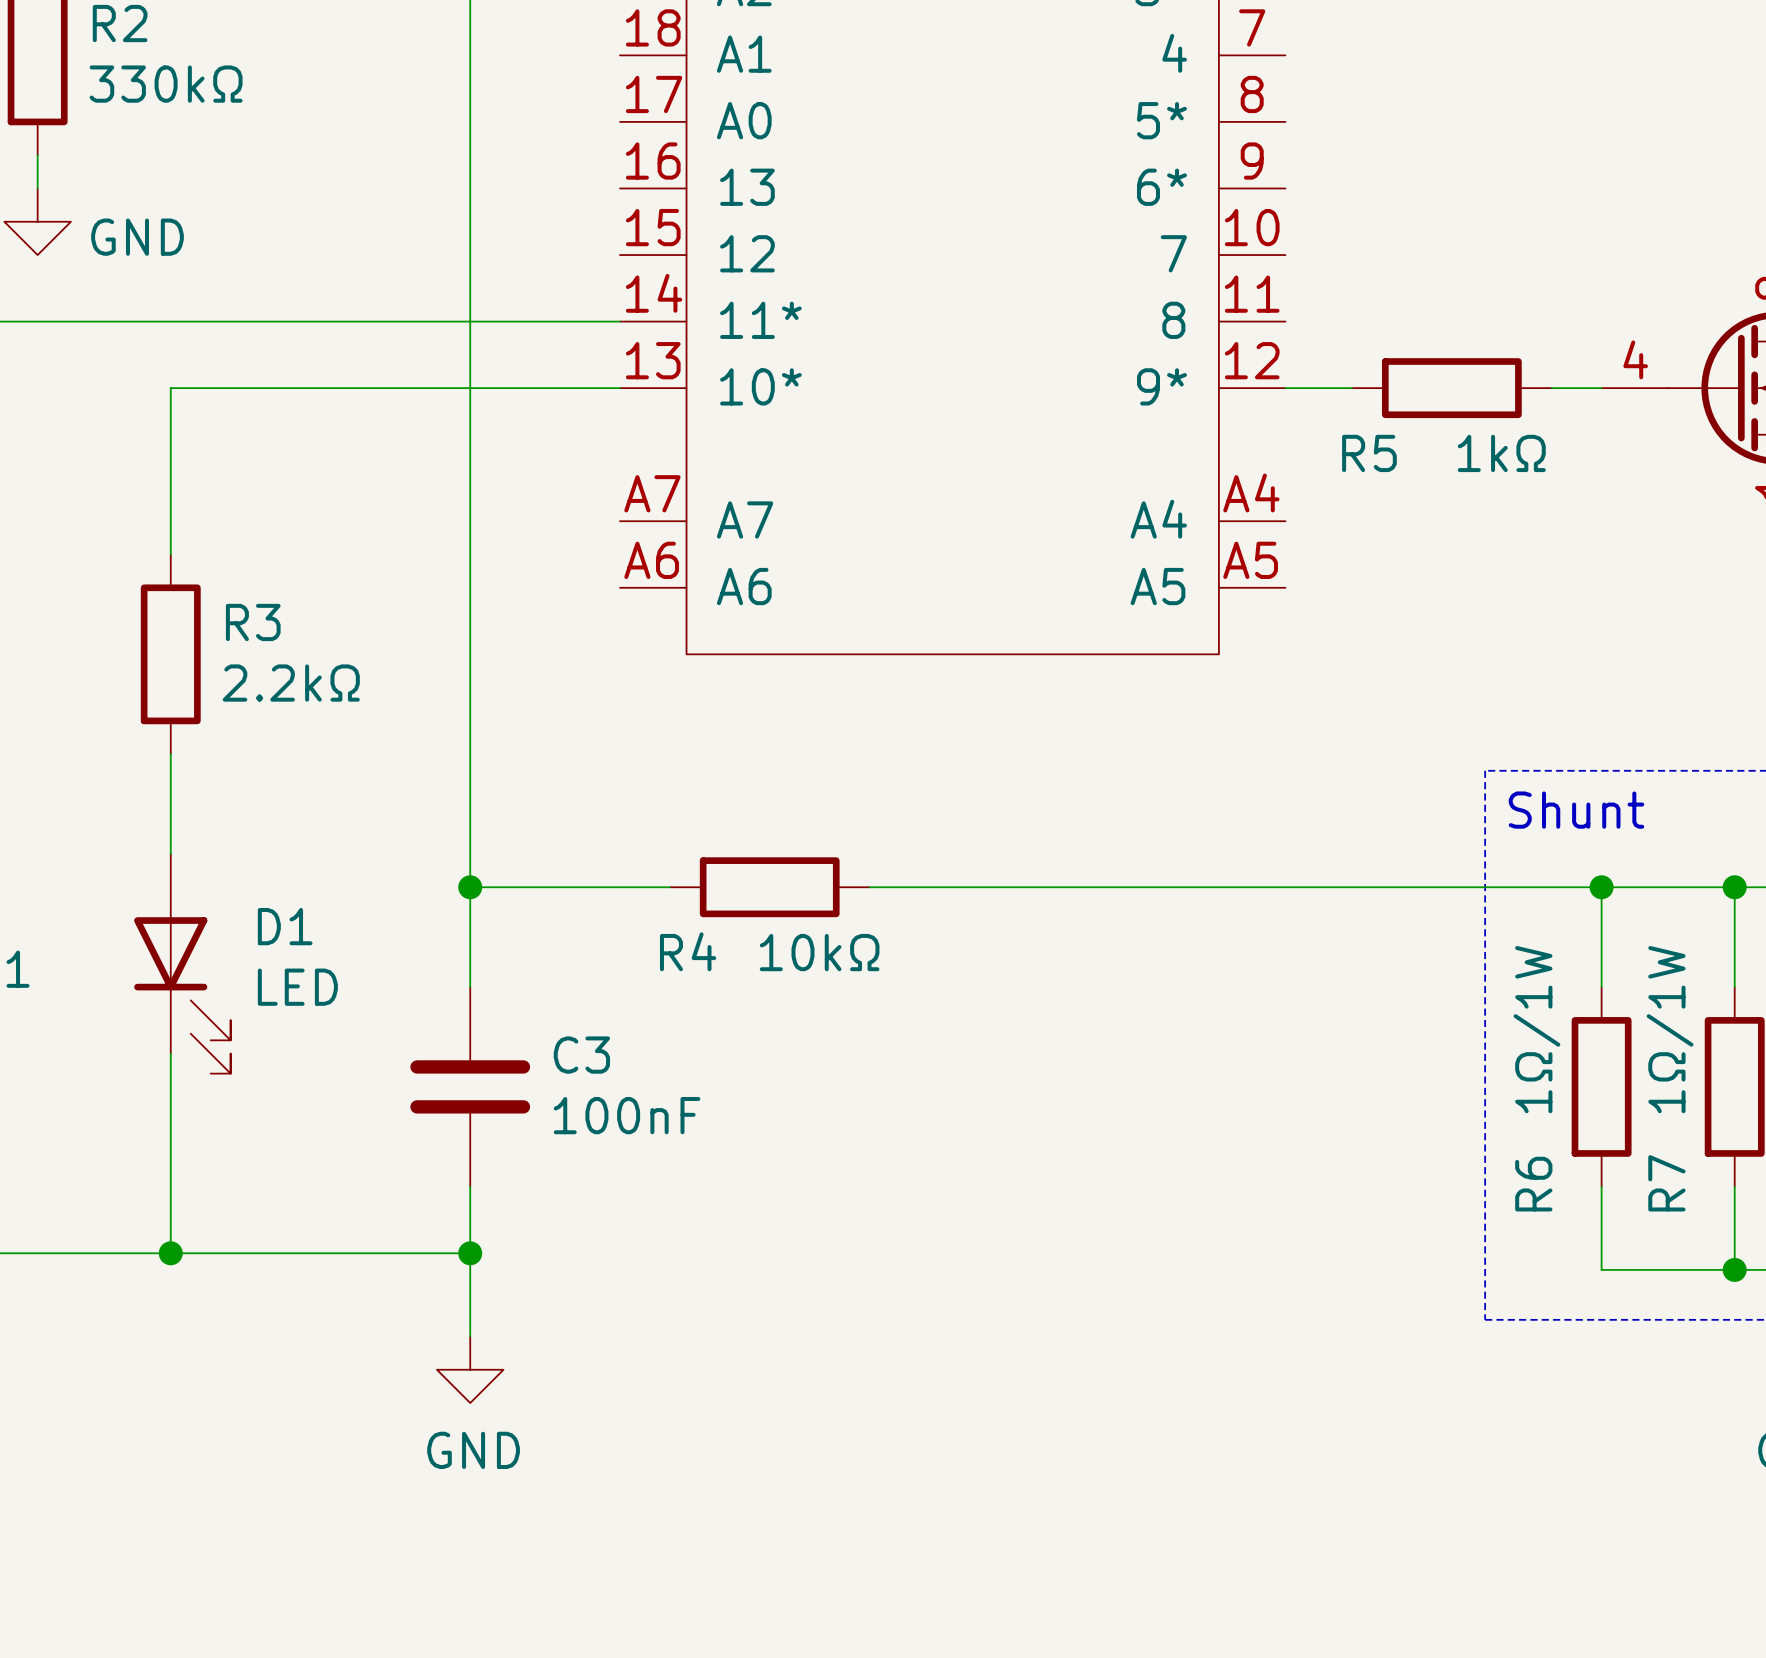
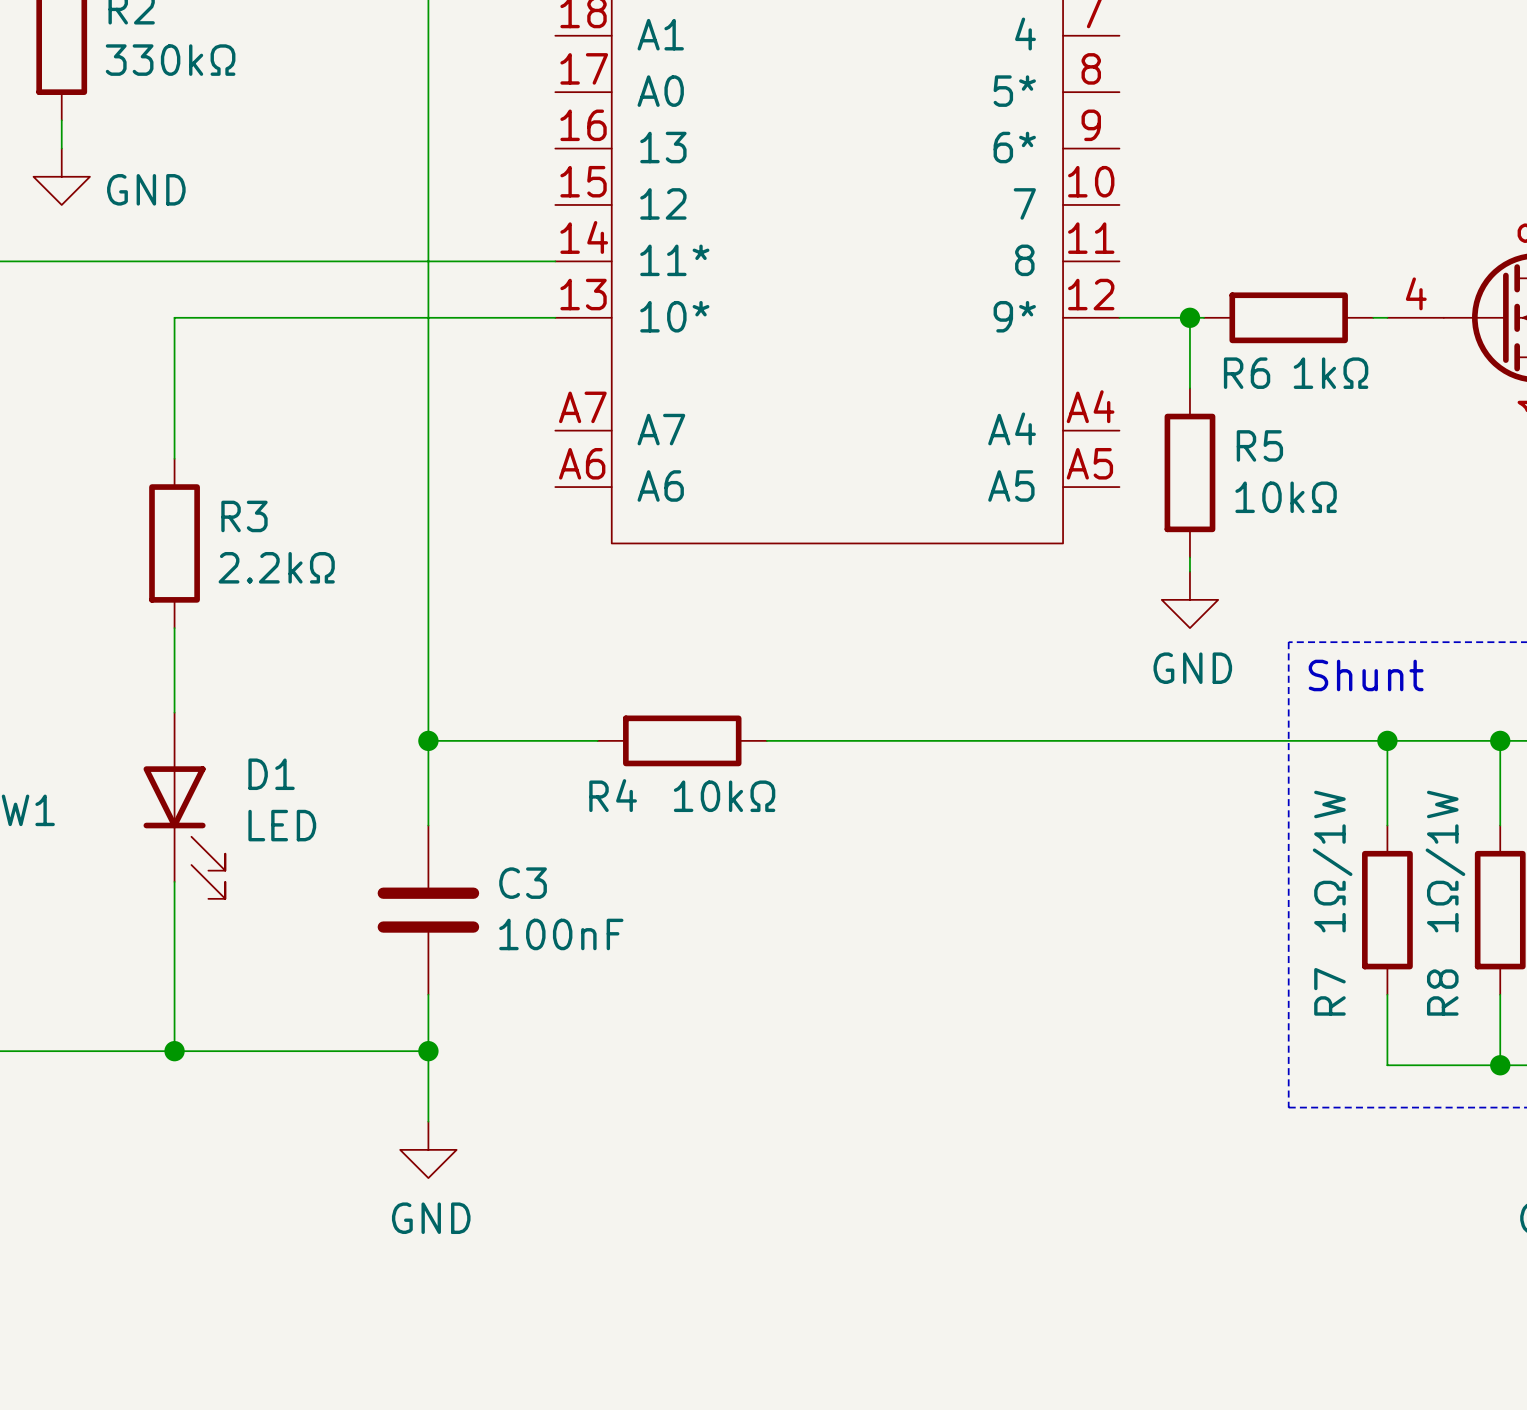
wire: none -> (1189, 317) (1189, 388)
junction: none -> (1189, 317)
R5 rotation: 0° (1451, 388) -> 90° clockwise (1189, 472)
R5 position: (1451, 388) -> (1189, 472)
R6: none -> 1kΩ (1288, 317)
R5 name position: R5 (1369, 453) -> R5 (1259, 445)
R5 value: 1kΩ (1501, 453) -> 10kΩ (1286, 497)
wire: none -> (1189, 557) (1189, 571)
power symbol: none -> GND (1189, 599)
R7 name: R7 (1666, 1183) -> R8 (1442, 992)
R6 name: R6 (1533, 1184) -> R7 (1329, 991)

